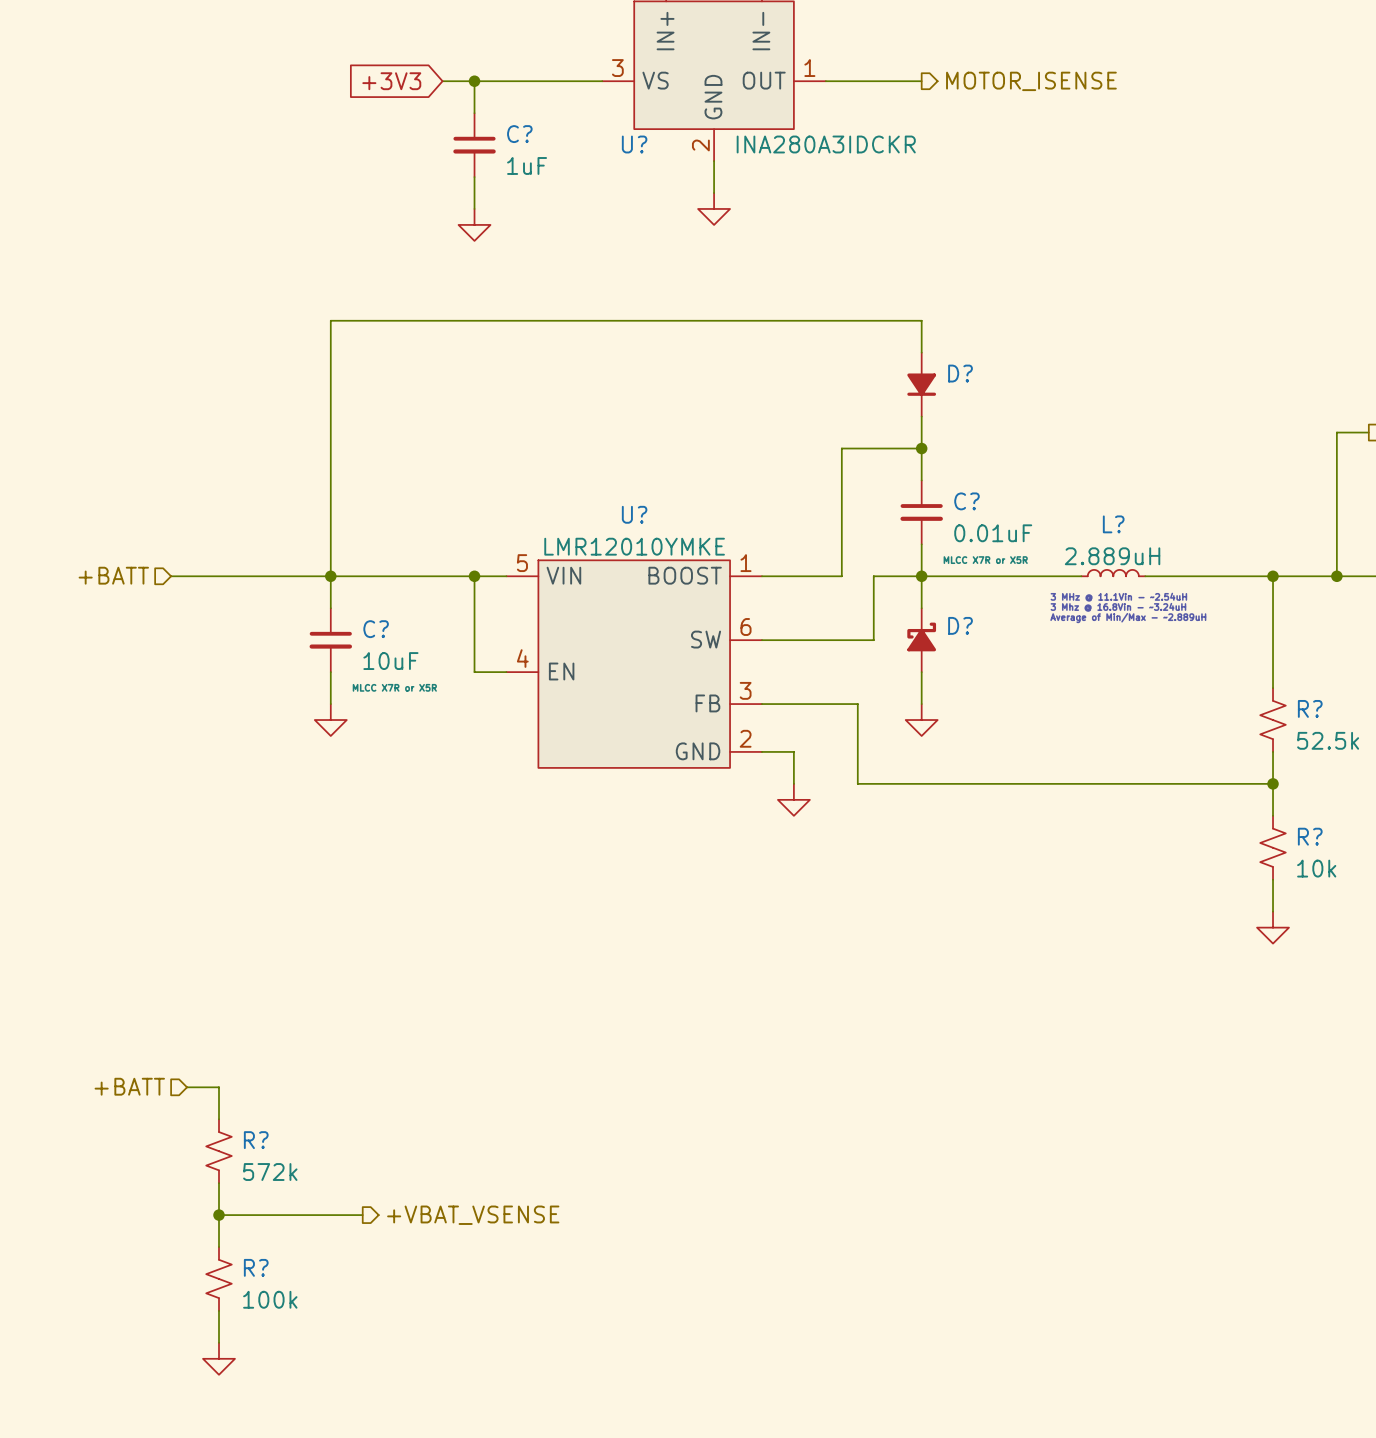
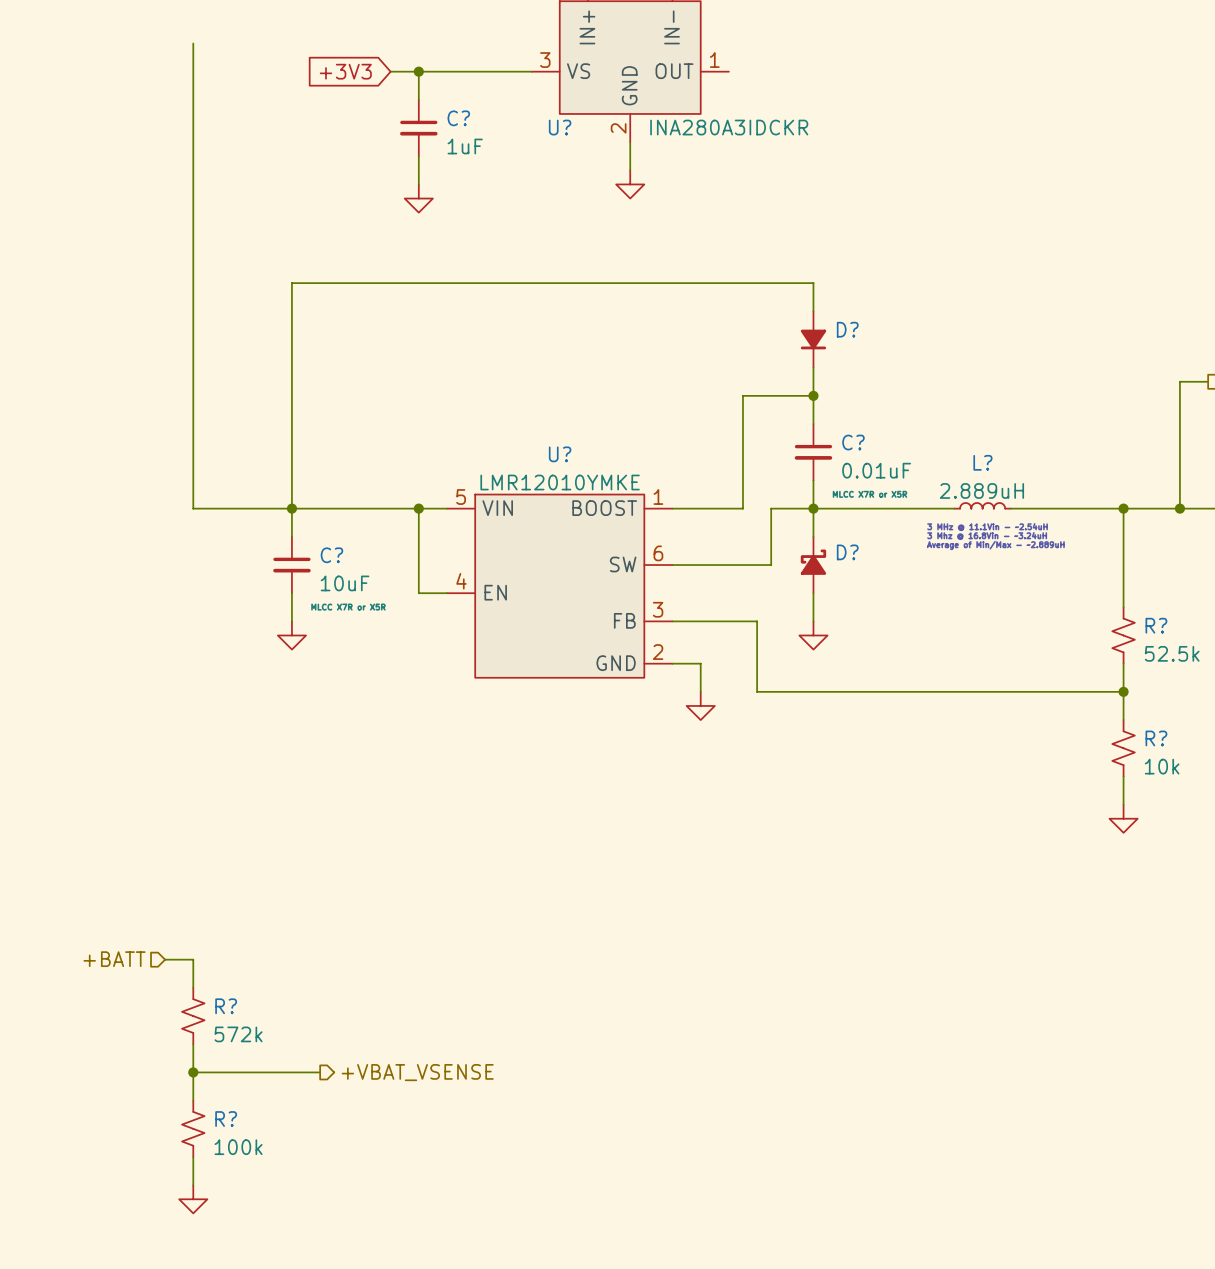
wire: (825, 81) (921, 81) -> none
hierarchical label: MOTOR_ISENSE (1031, 81) -> none
hierarchical label: +BATT (113, 575) -> none
wire: (171, 576) (219, 576) -> (193, 43) (193, 508)

